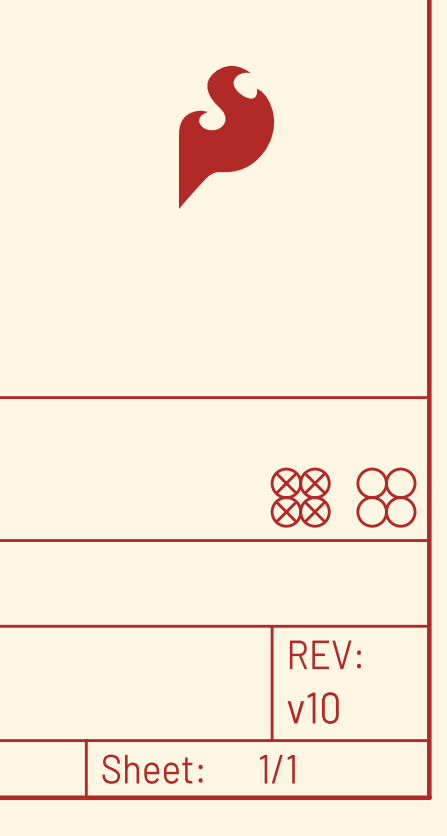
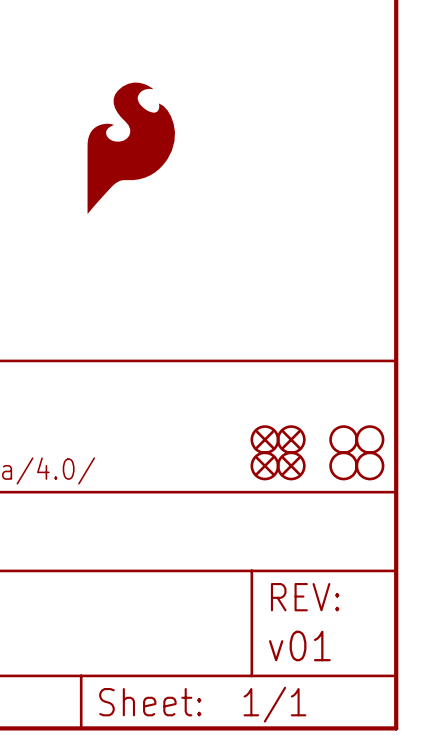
part position: (226, 137) -> (131, 148)
part text: v10 (313, 708) -> v01 (299, 645)

